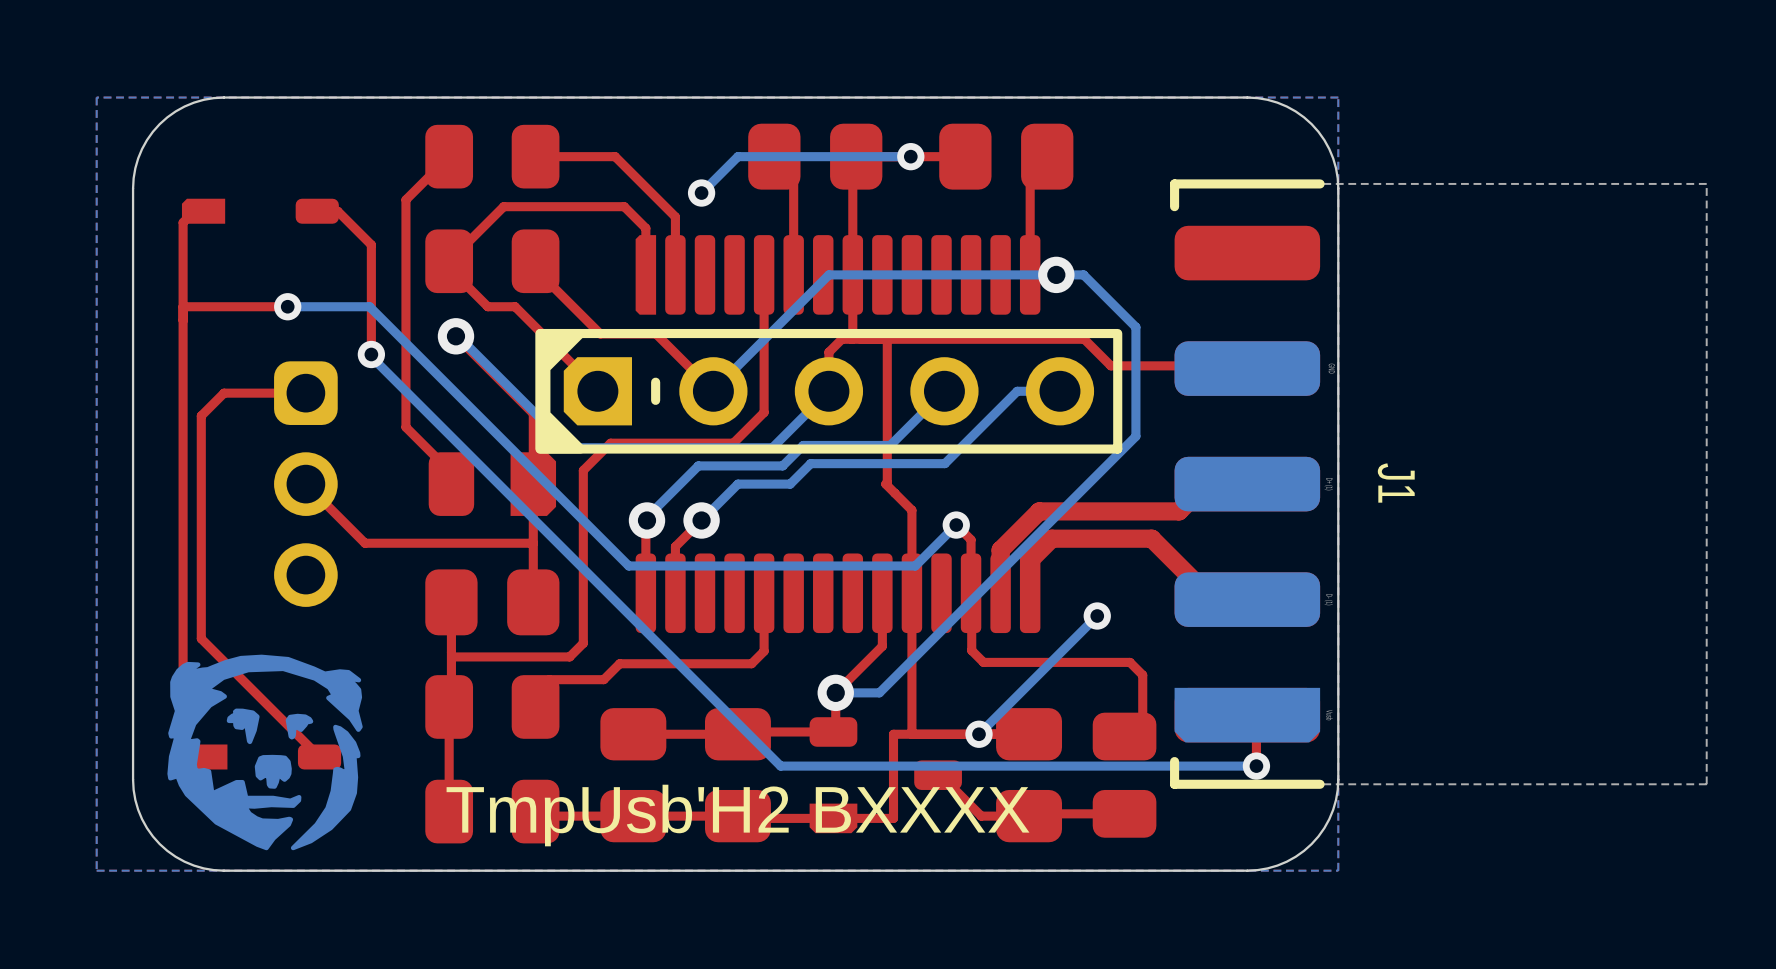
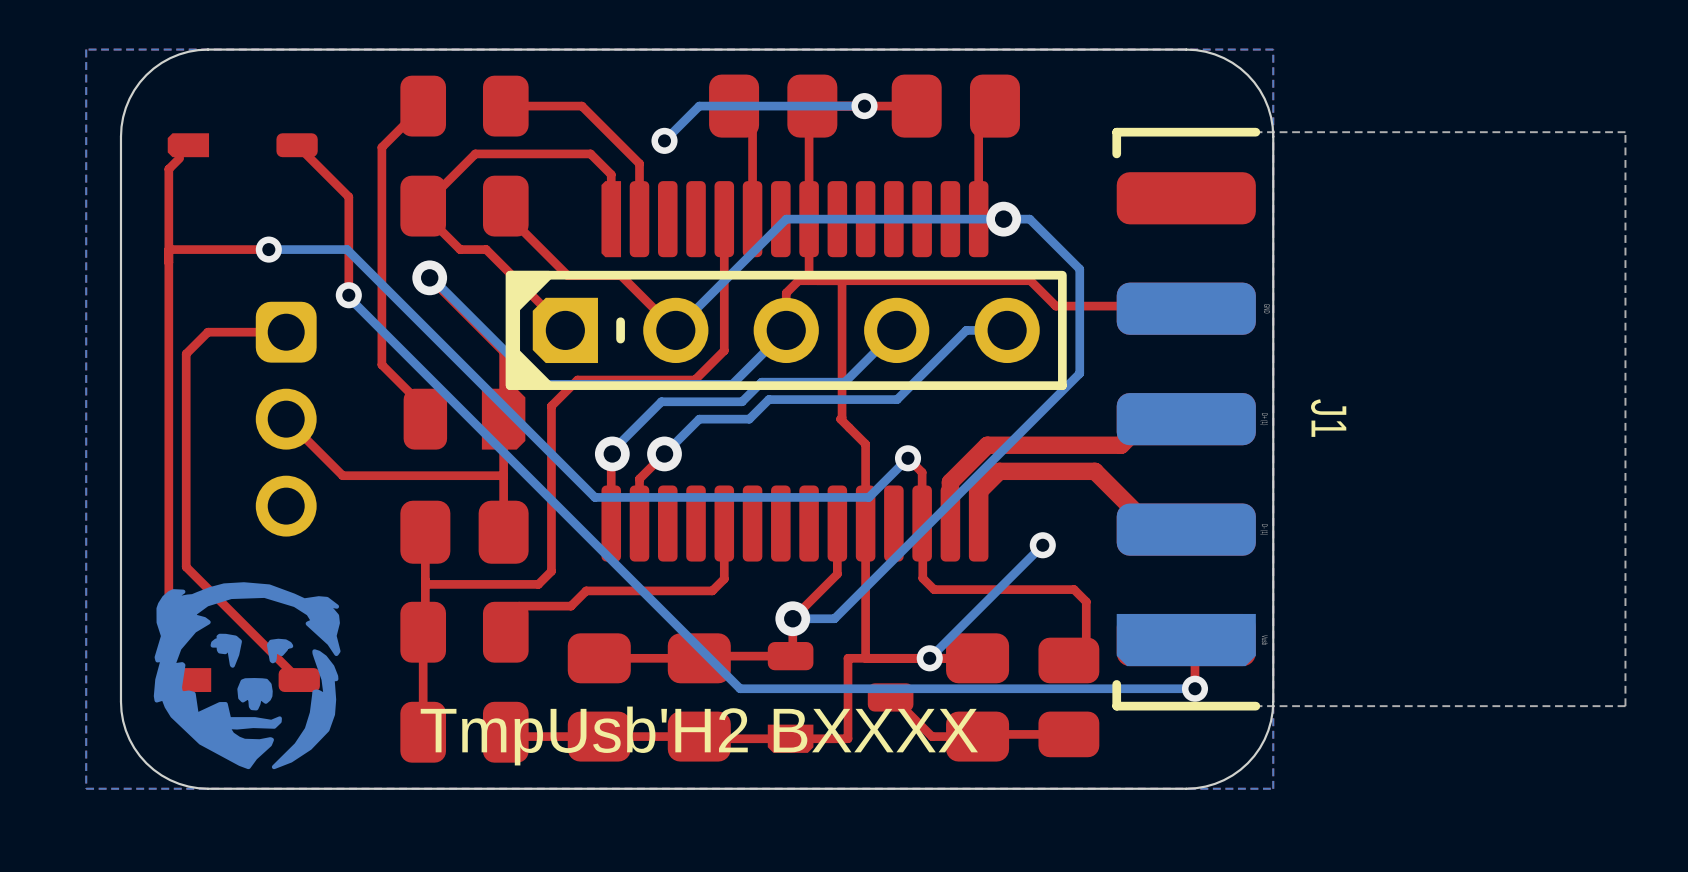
part position: (260, 211) -> (242, 145)
top track: (308, 211) (337, 211) (371, 244) (371, 251) -> (297, 145) (348, 196)

